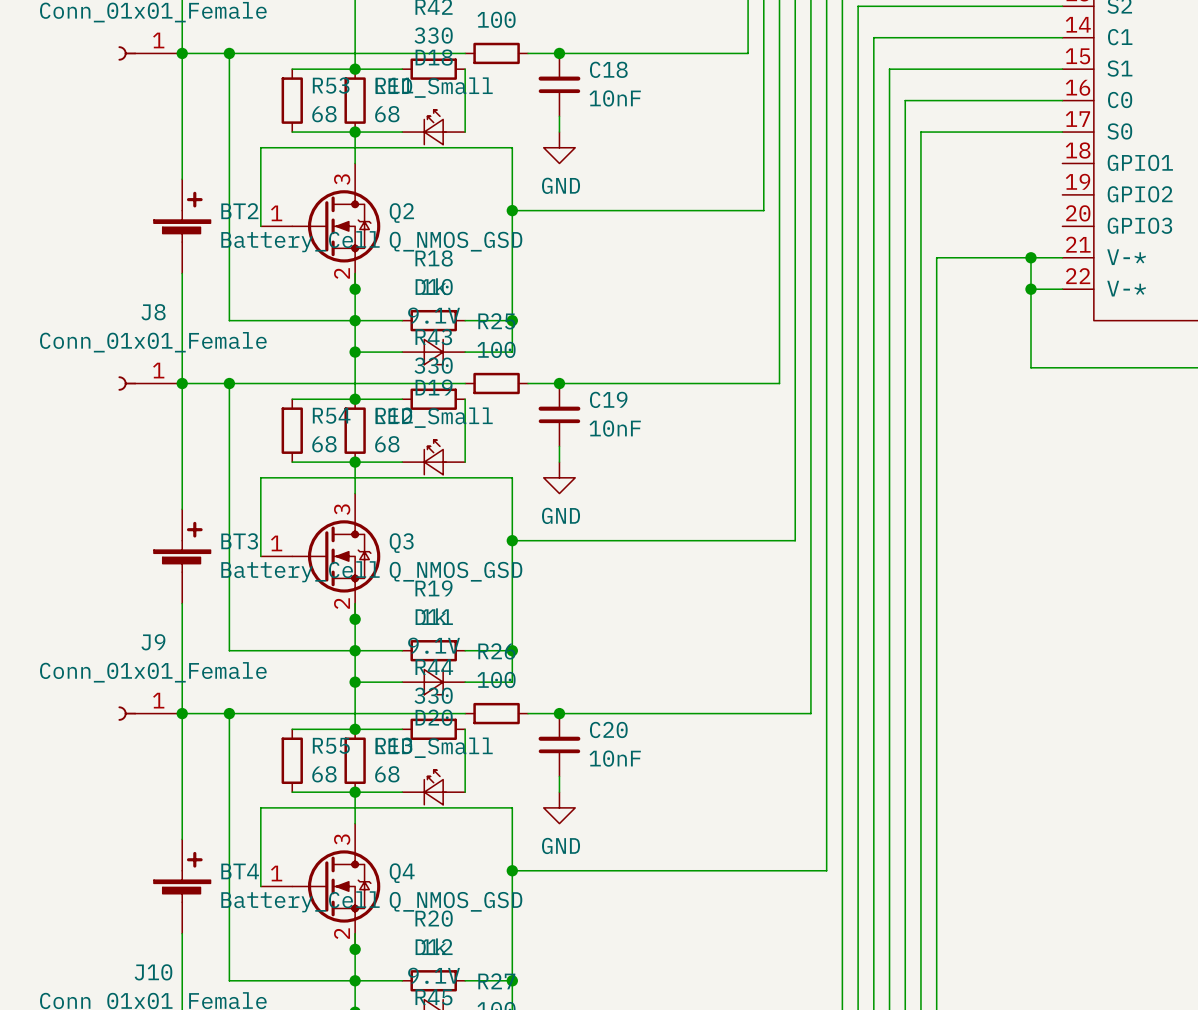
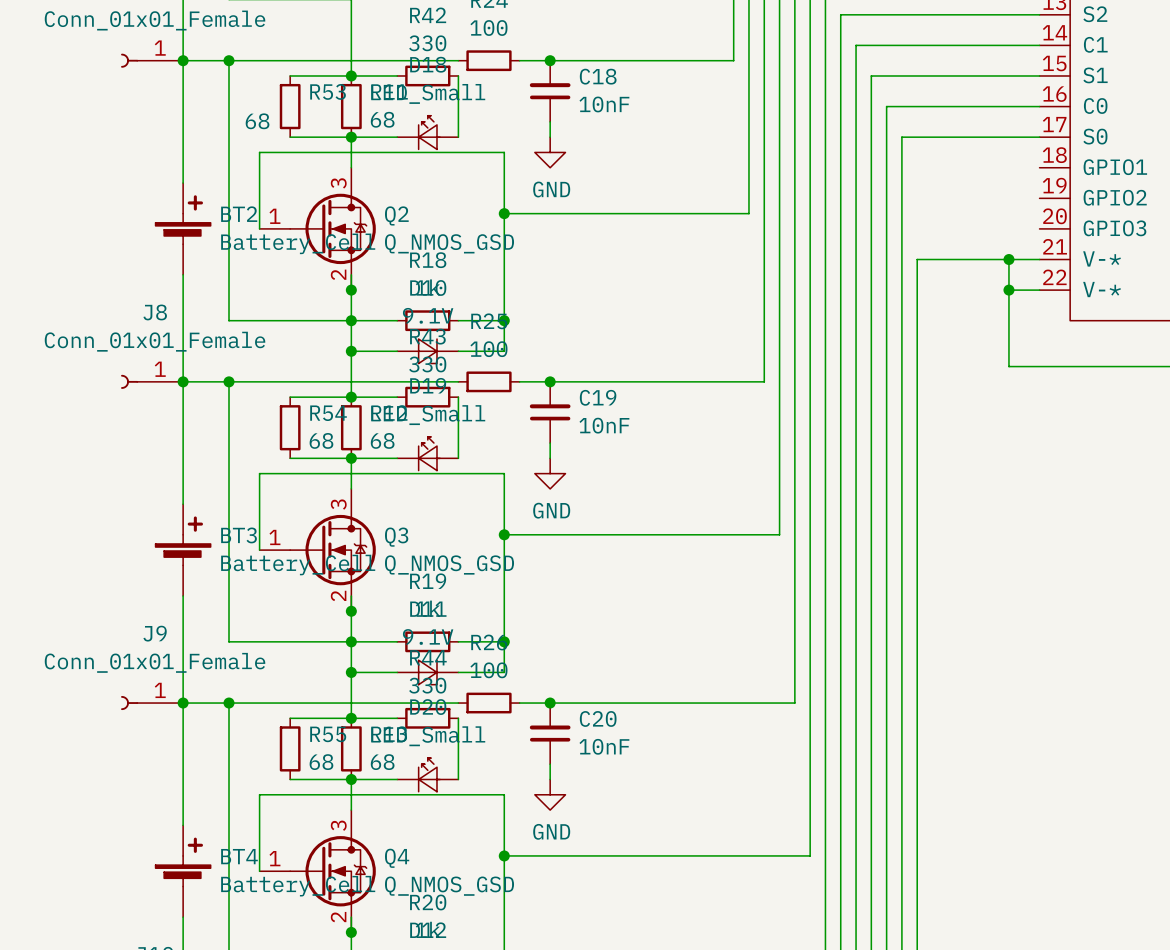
R53 value position: 68 (324, 114) -> 68 (257, 121)

